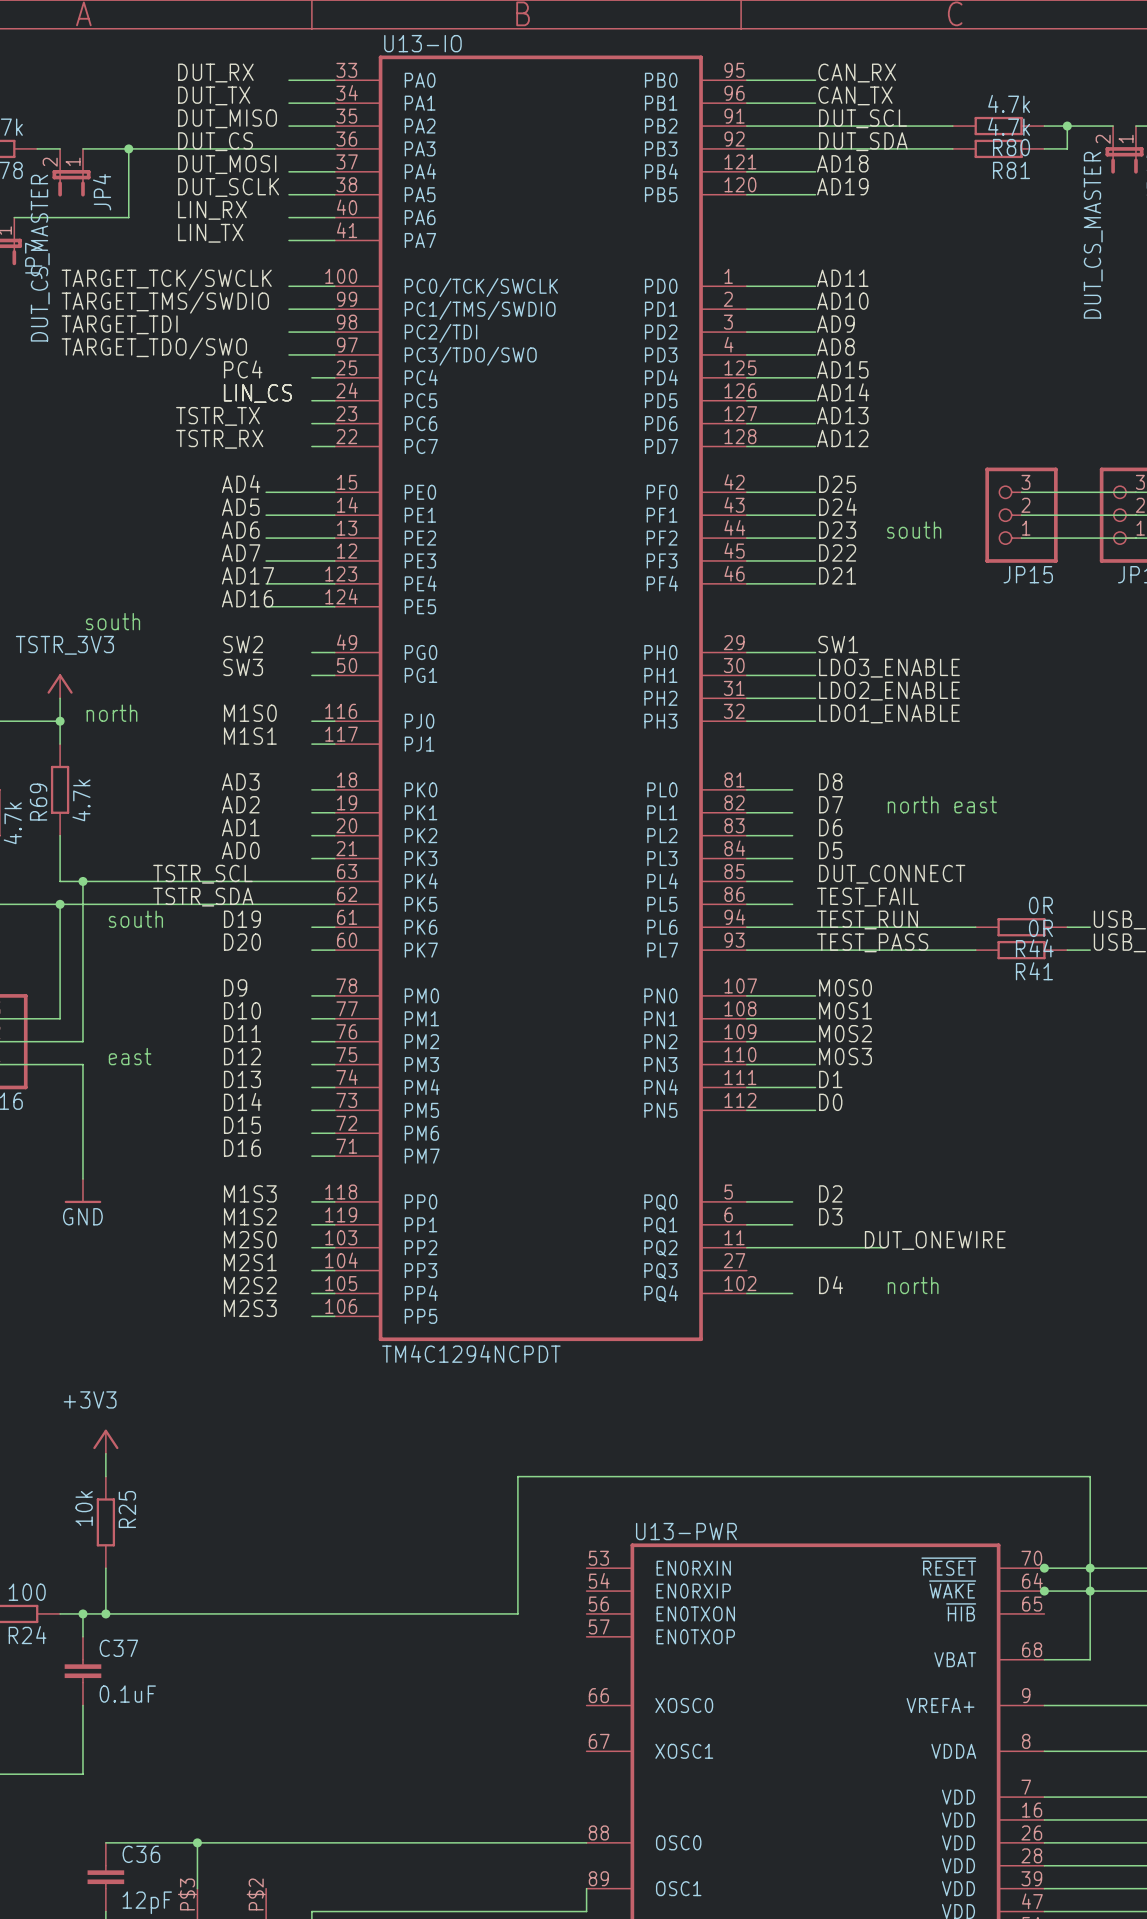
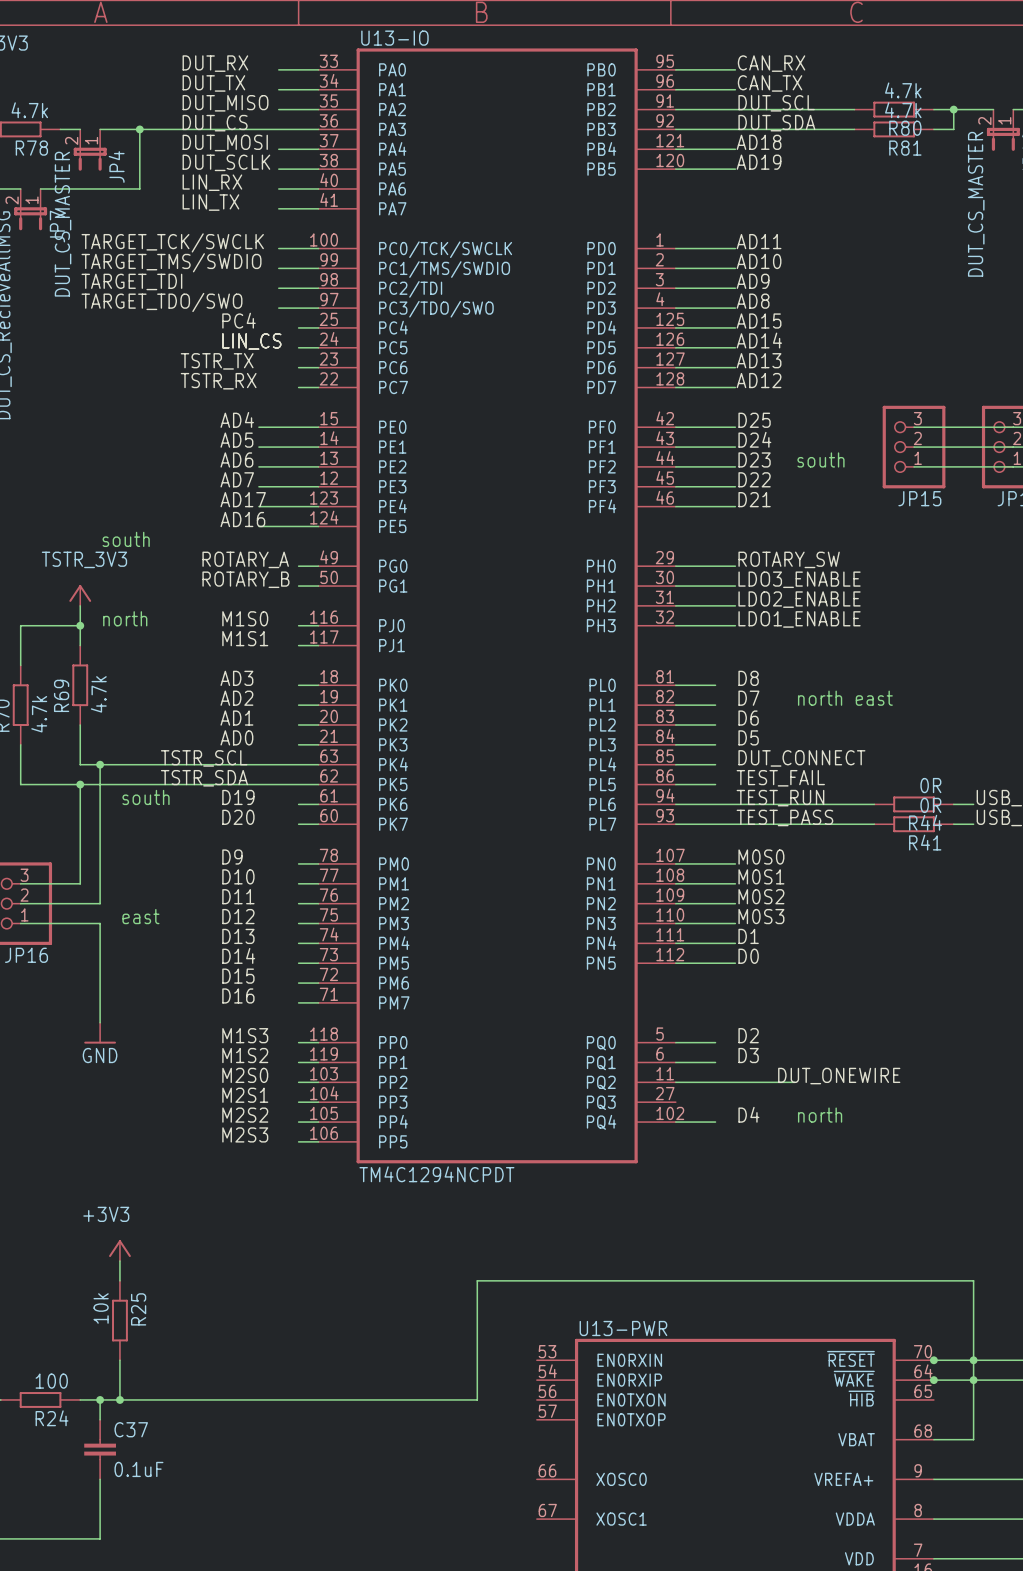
label: SW2 (243, 644) -> none
label: SW1 (838, 644) -> ROTARY_SW (789, 559)
label: none -> ROTARY_A (245, 559)
label: SW3 (243, 667) -> none
label: none -> ROTARY_B (245, 579)

